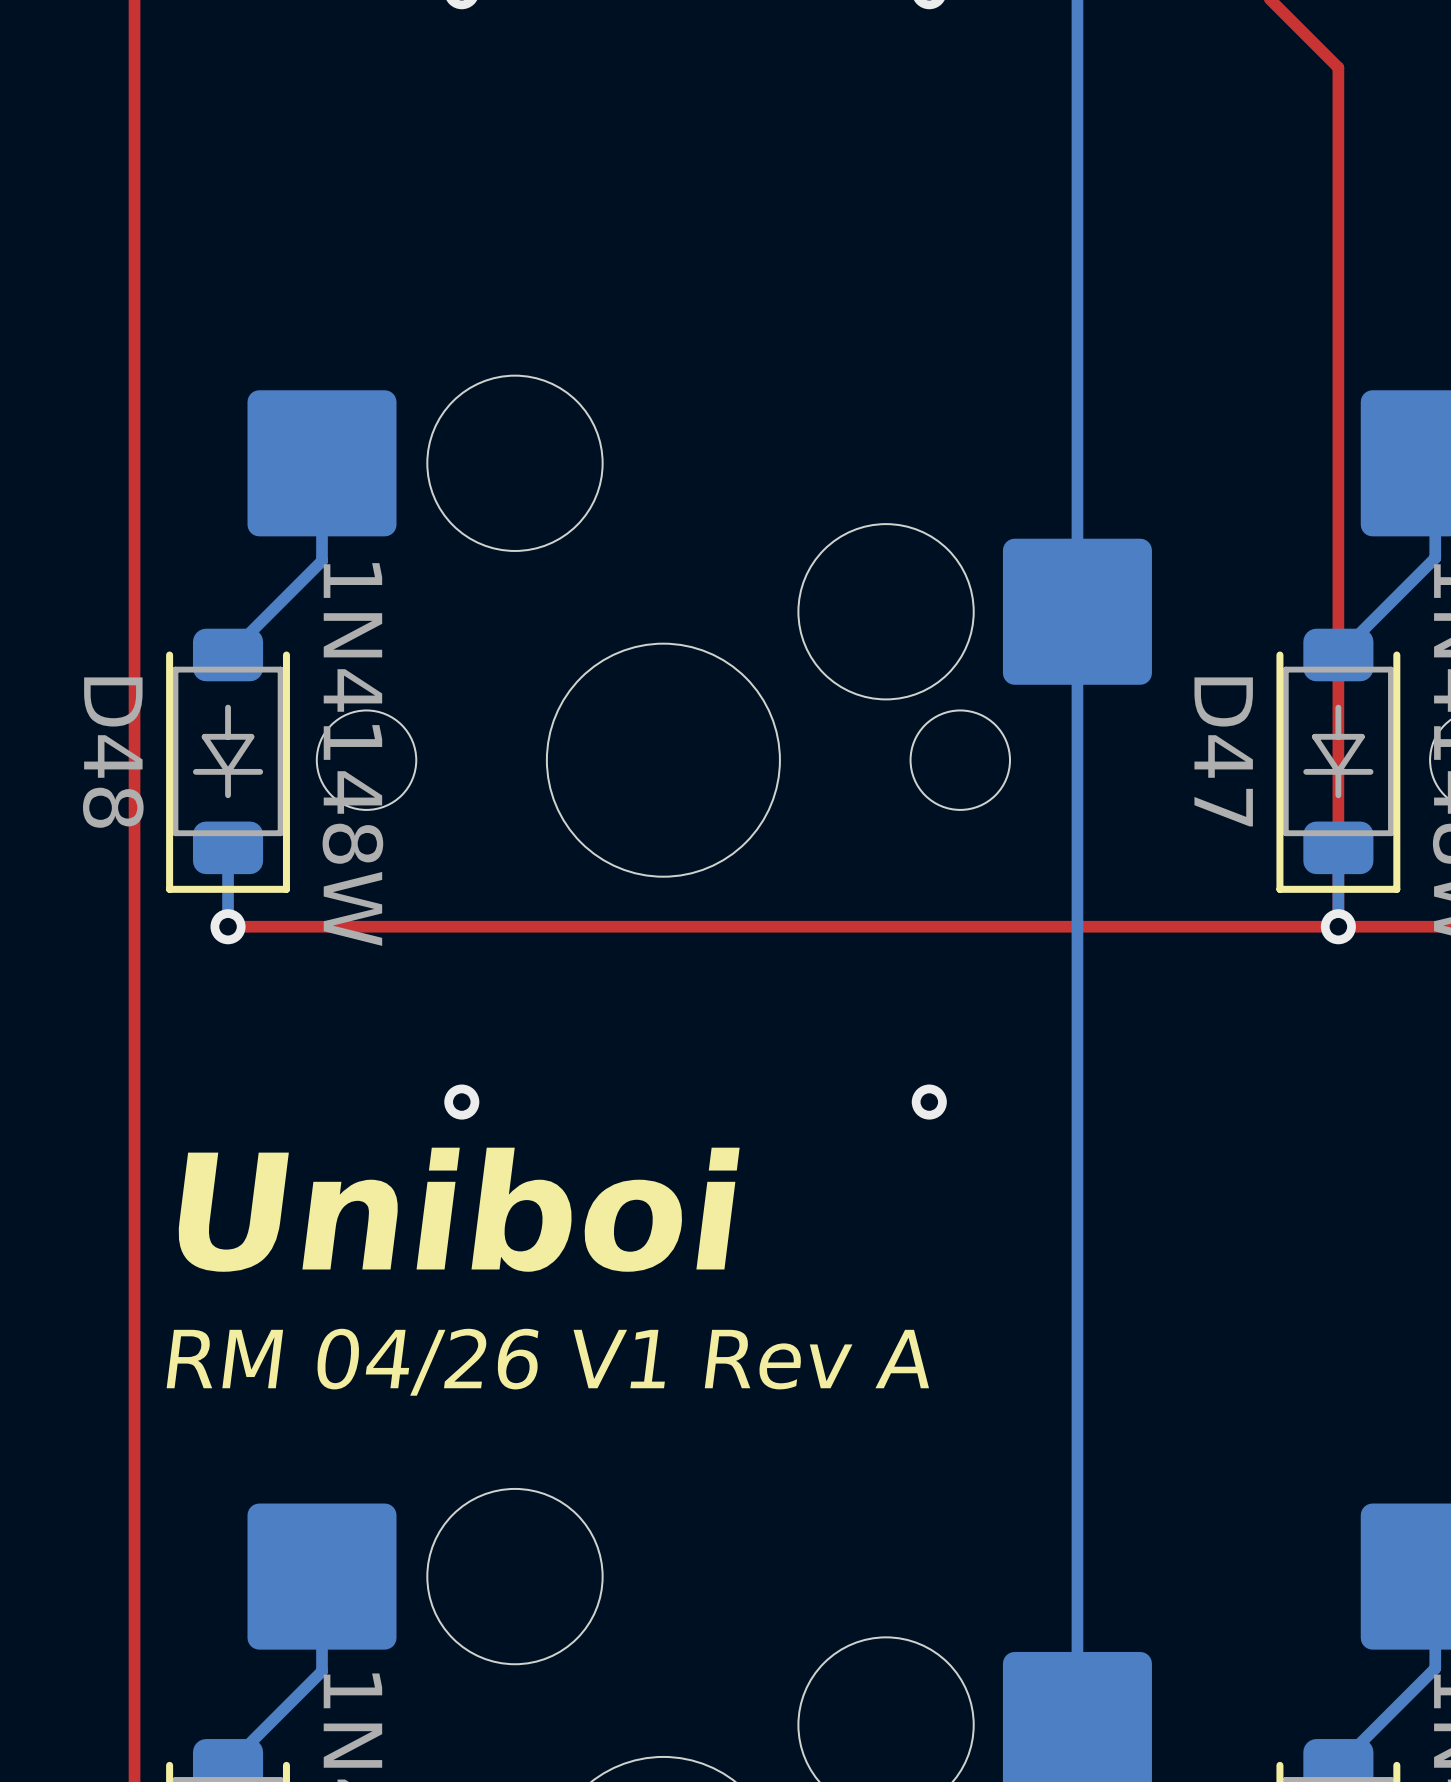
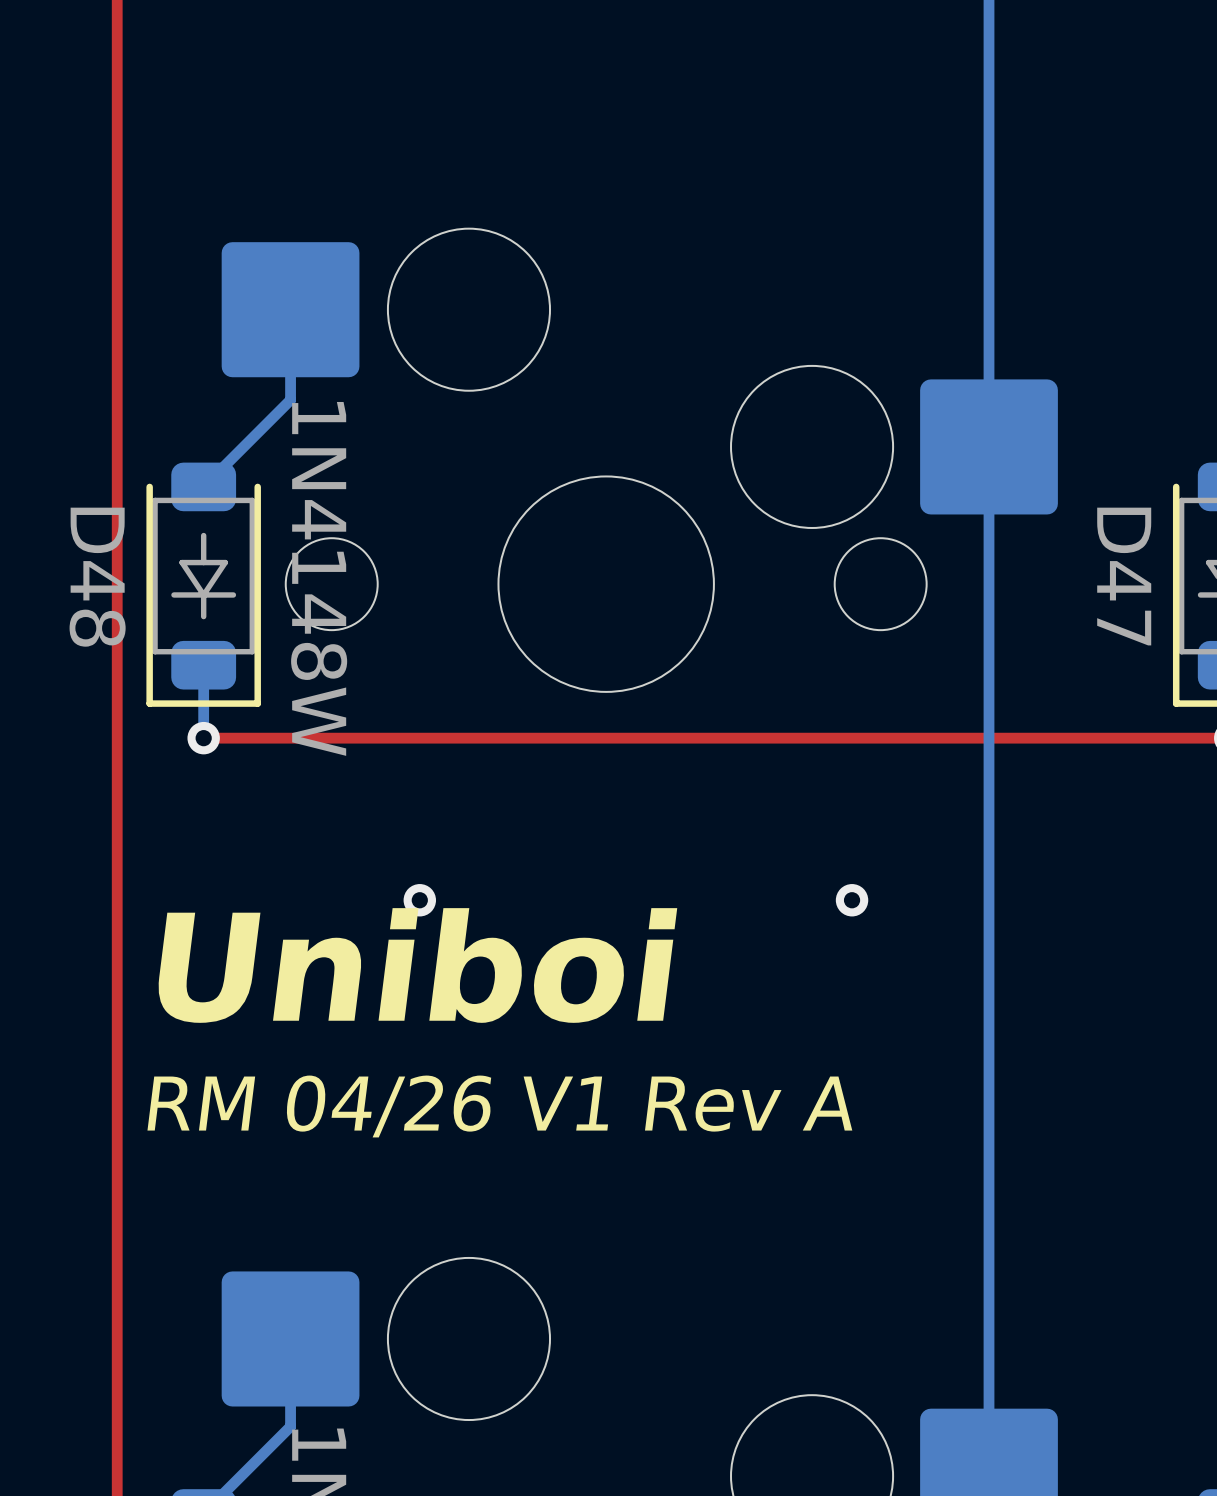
text position: Uniboi (457, 1209) -> Uniboi (416, 965)
text position: RM 04/26 V1 Rev A (547, 1362) -> RM 04/26 V1 Rev A (499, 1106)

